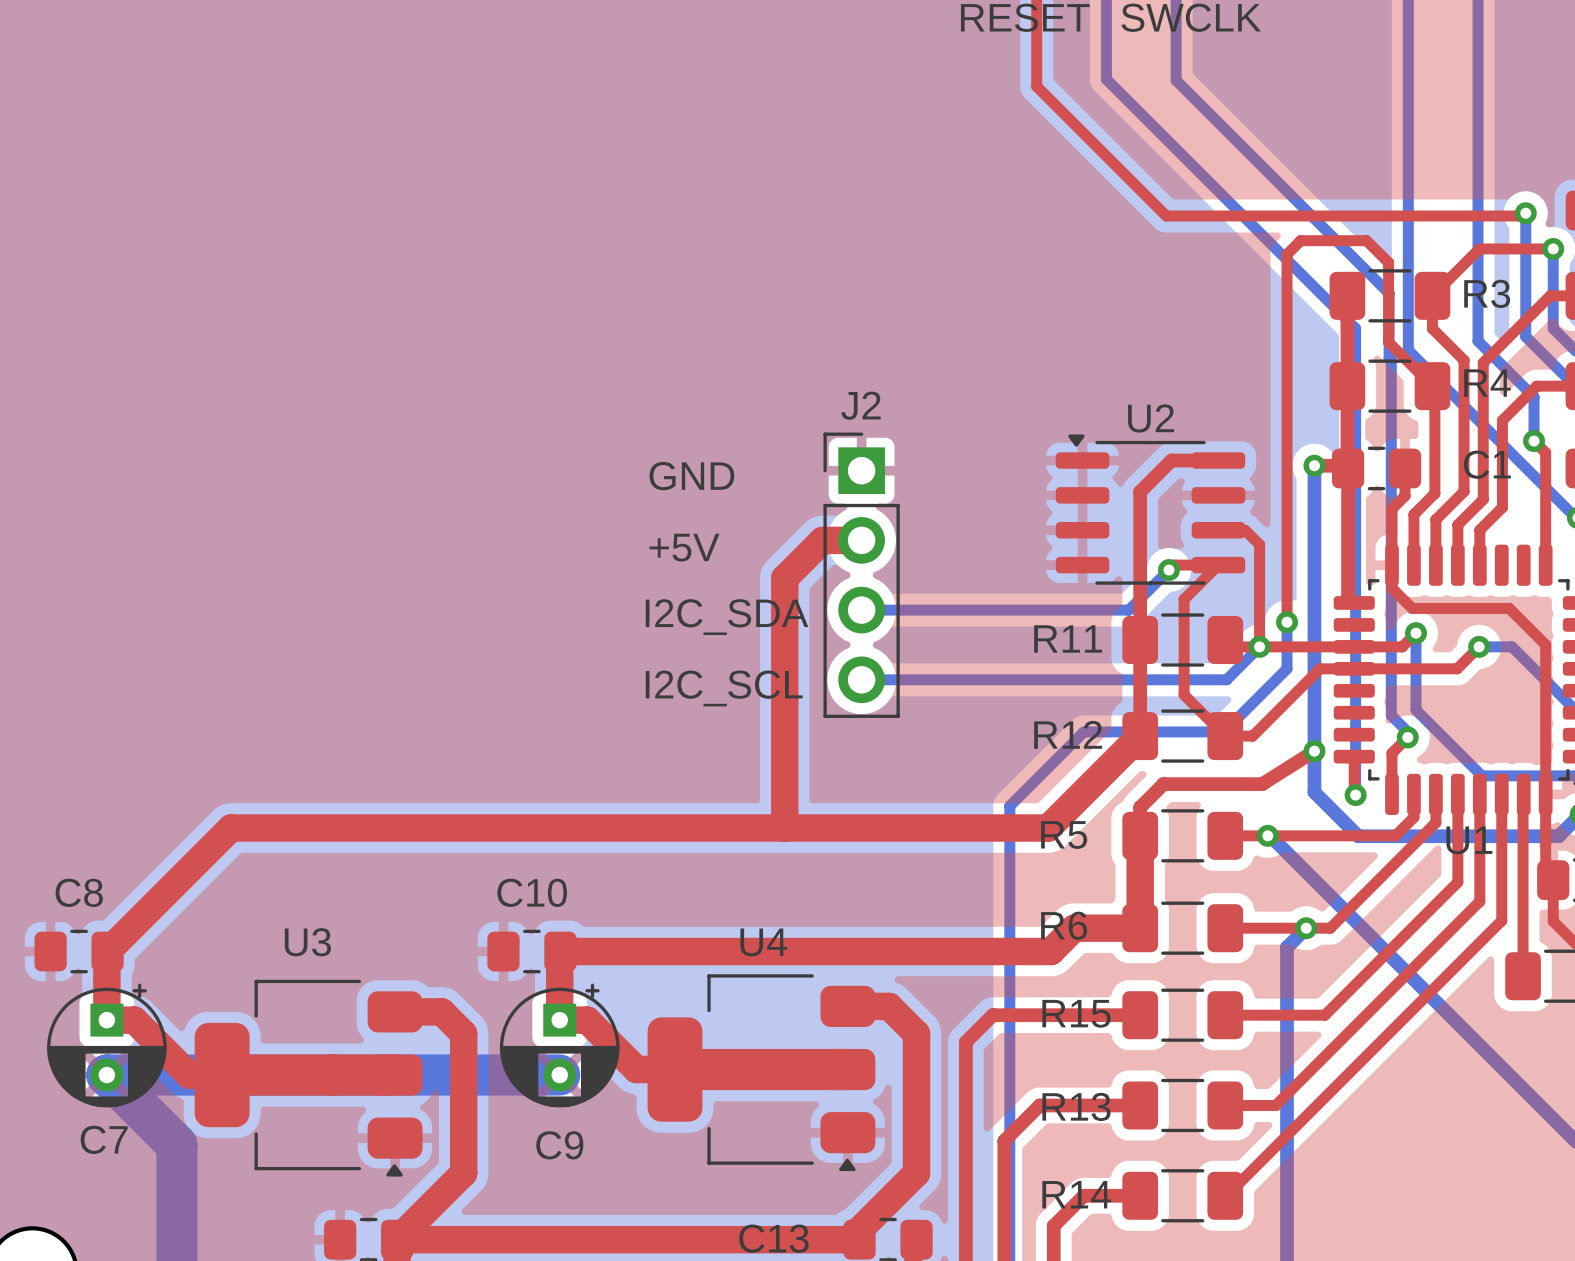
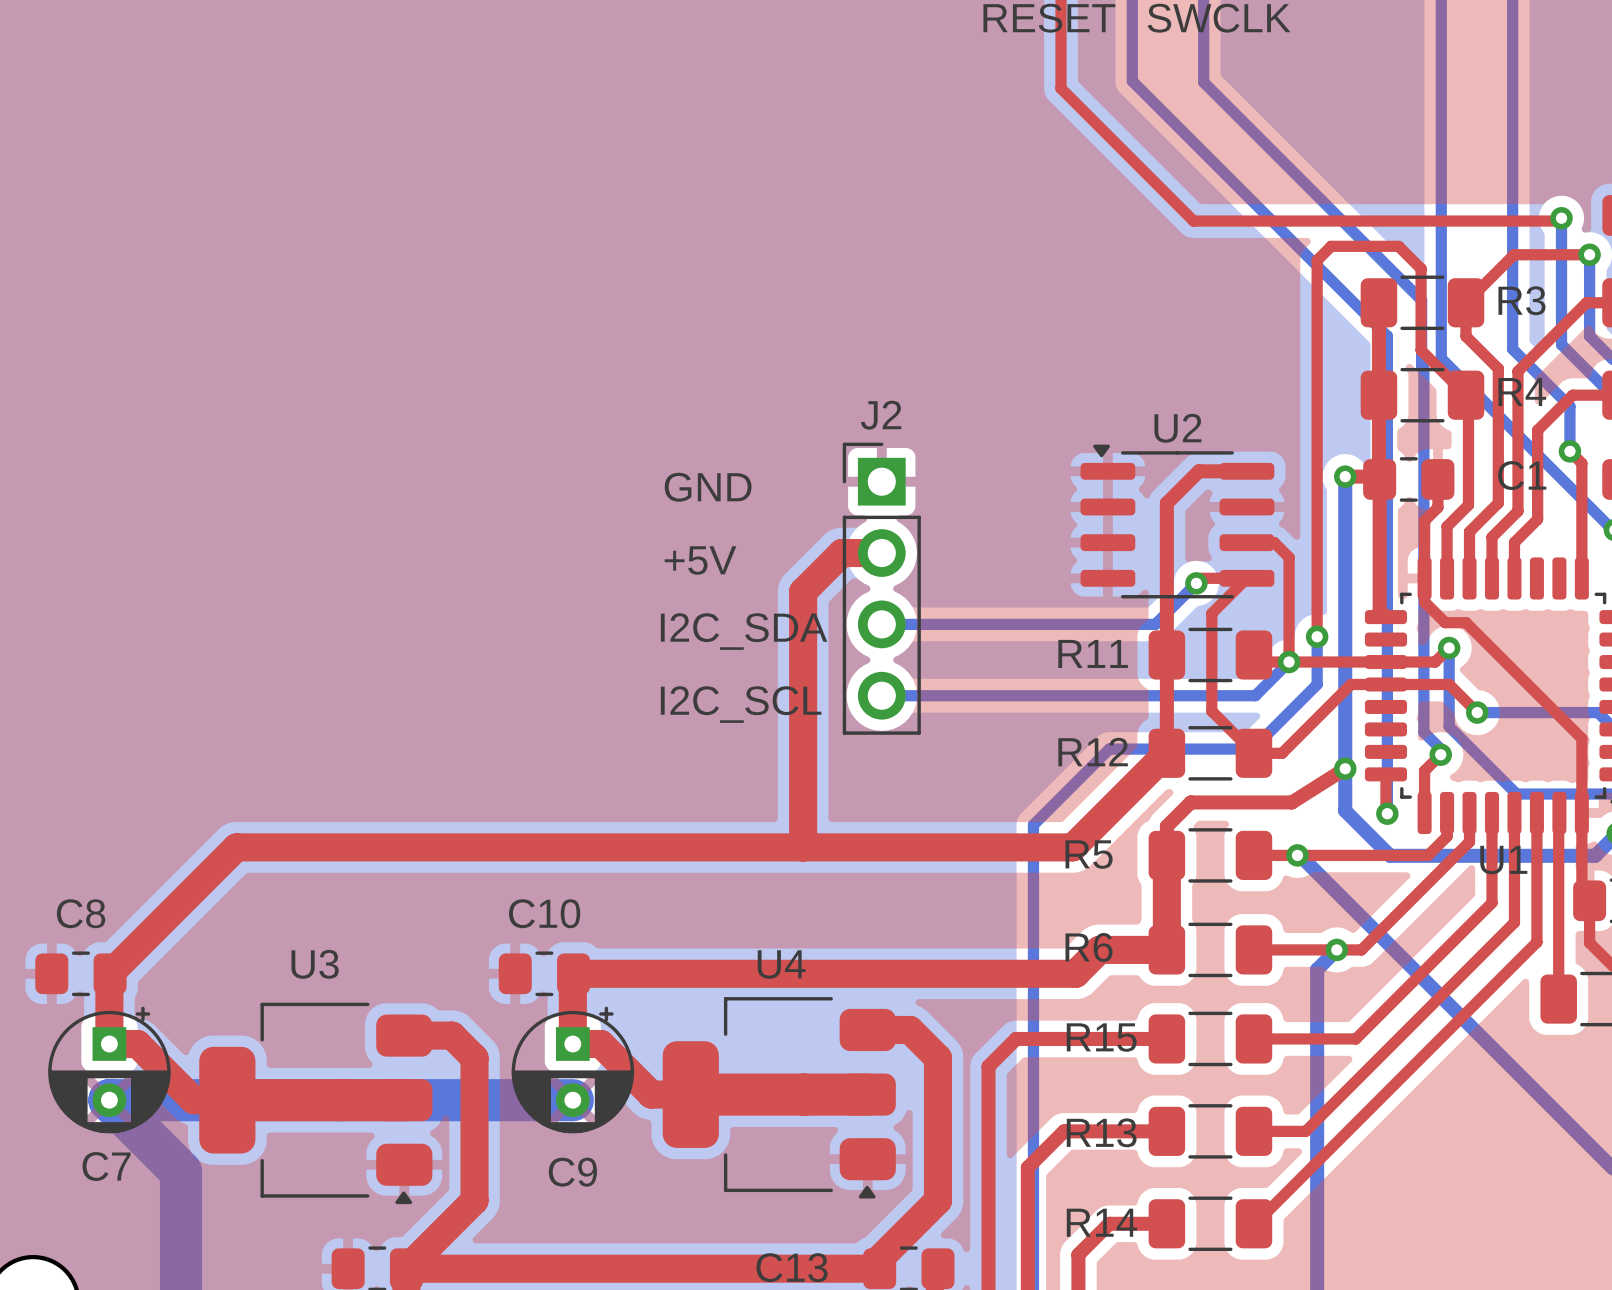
top track: (1432, 608) (1509, 608) (1545, 644) (1545, 721) -> (1466, 622) (1581, 738)
top track: (1479, 646) (1457, 668) (1416, 668) -> (1477, 712) (1449, 684)
bottom track: (1479, 646) (1512, 646) (1561, 696) -> (1477, 712) (1598, 712)
via position: (1479, 646) -> (1477, 712)

